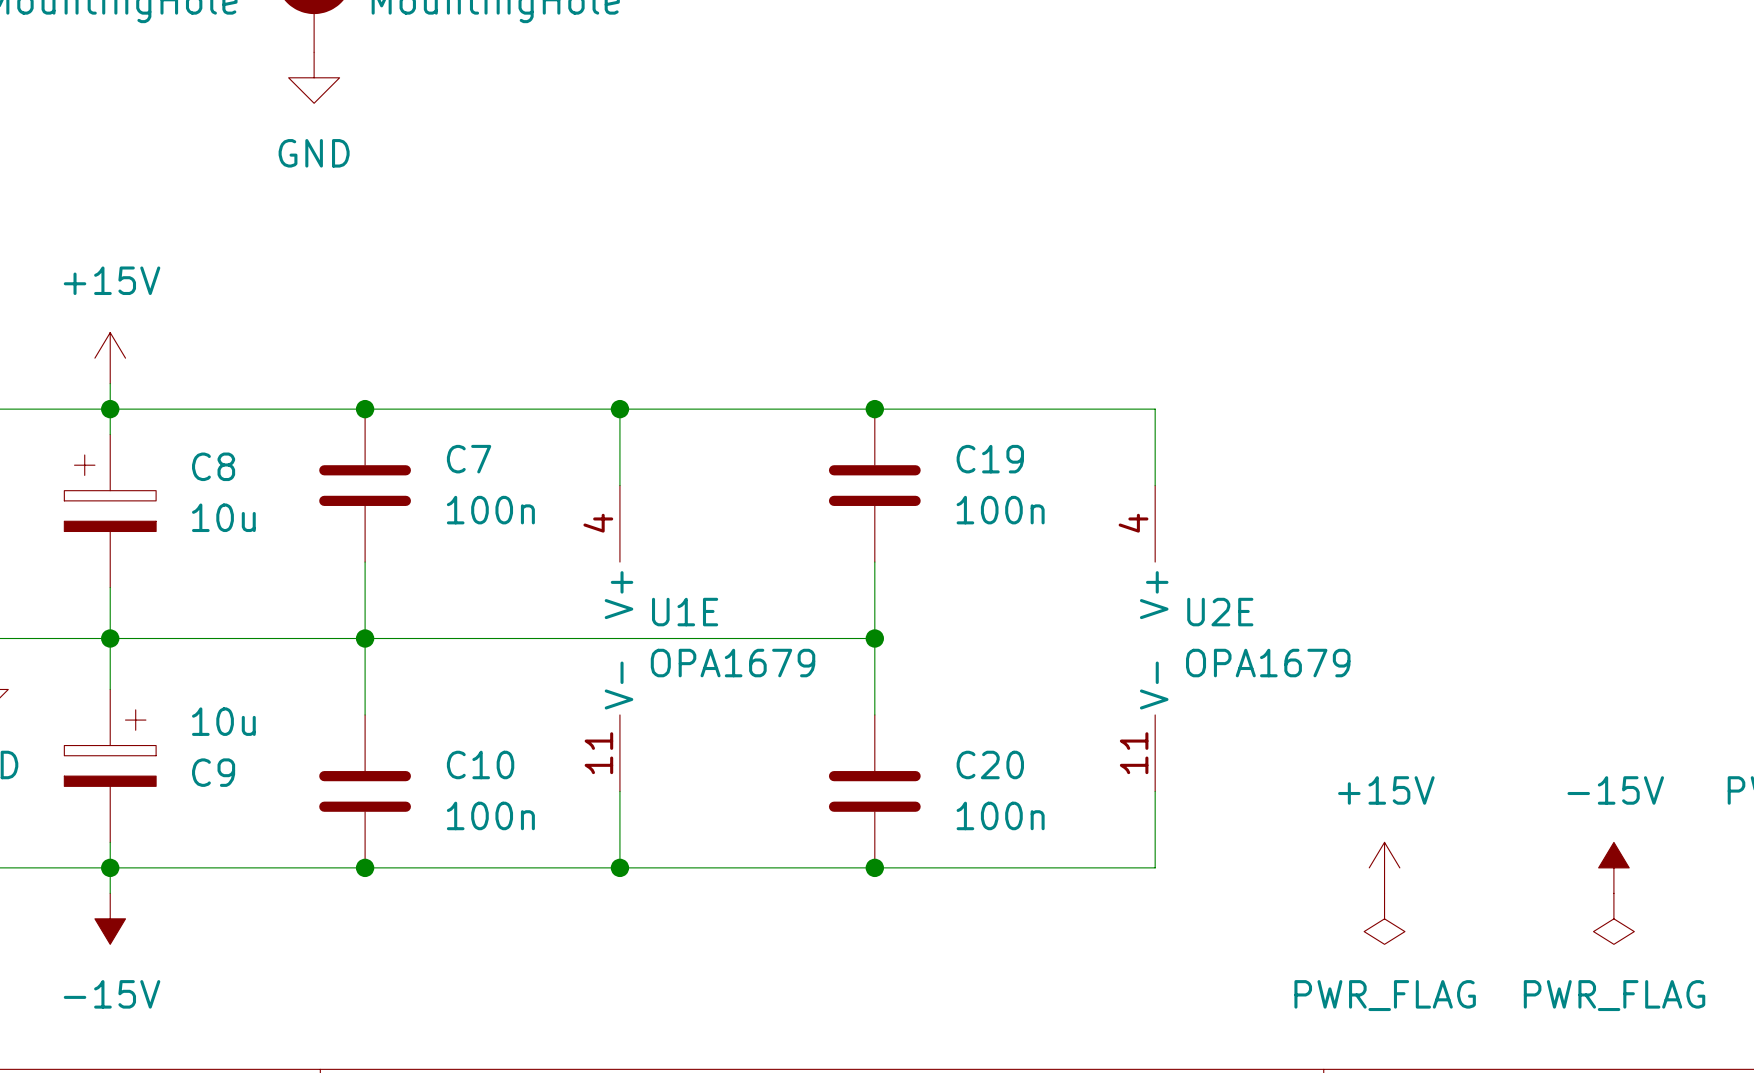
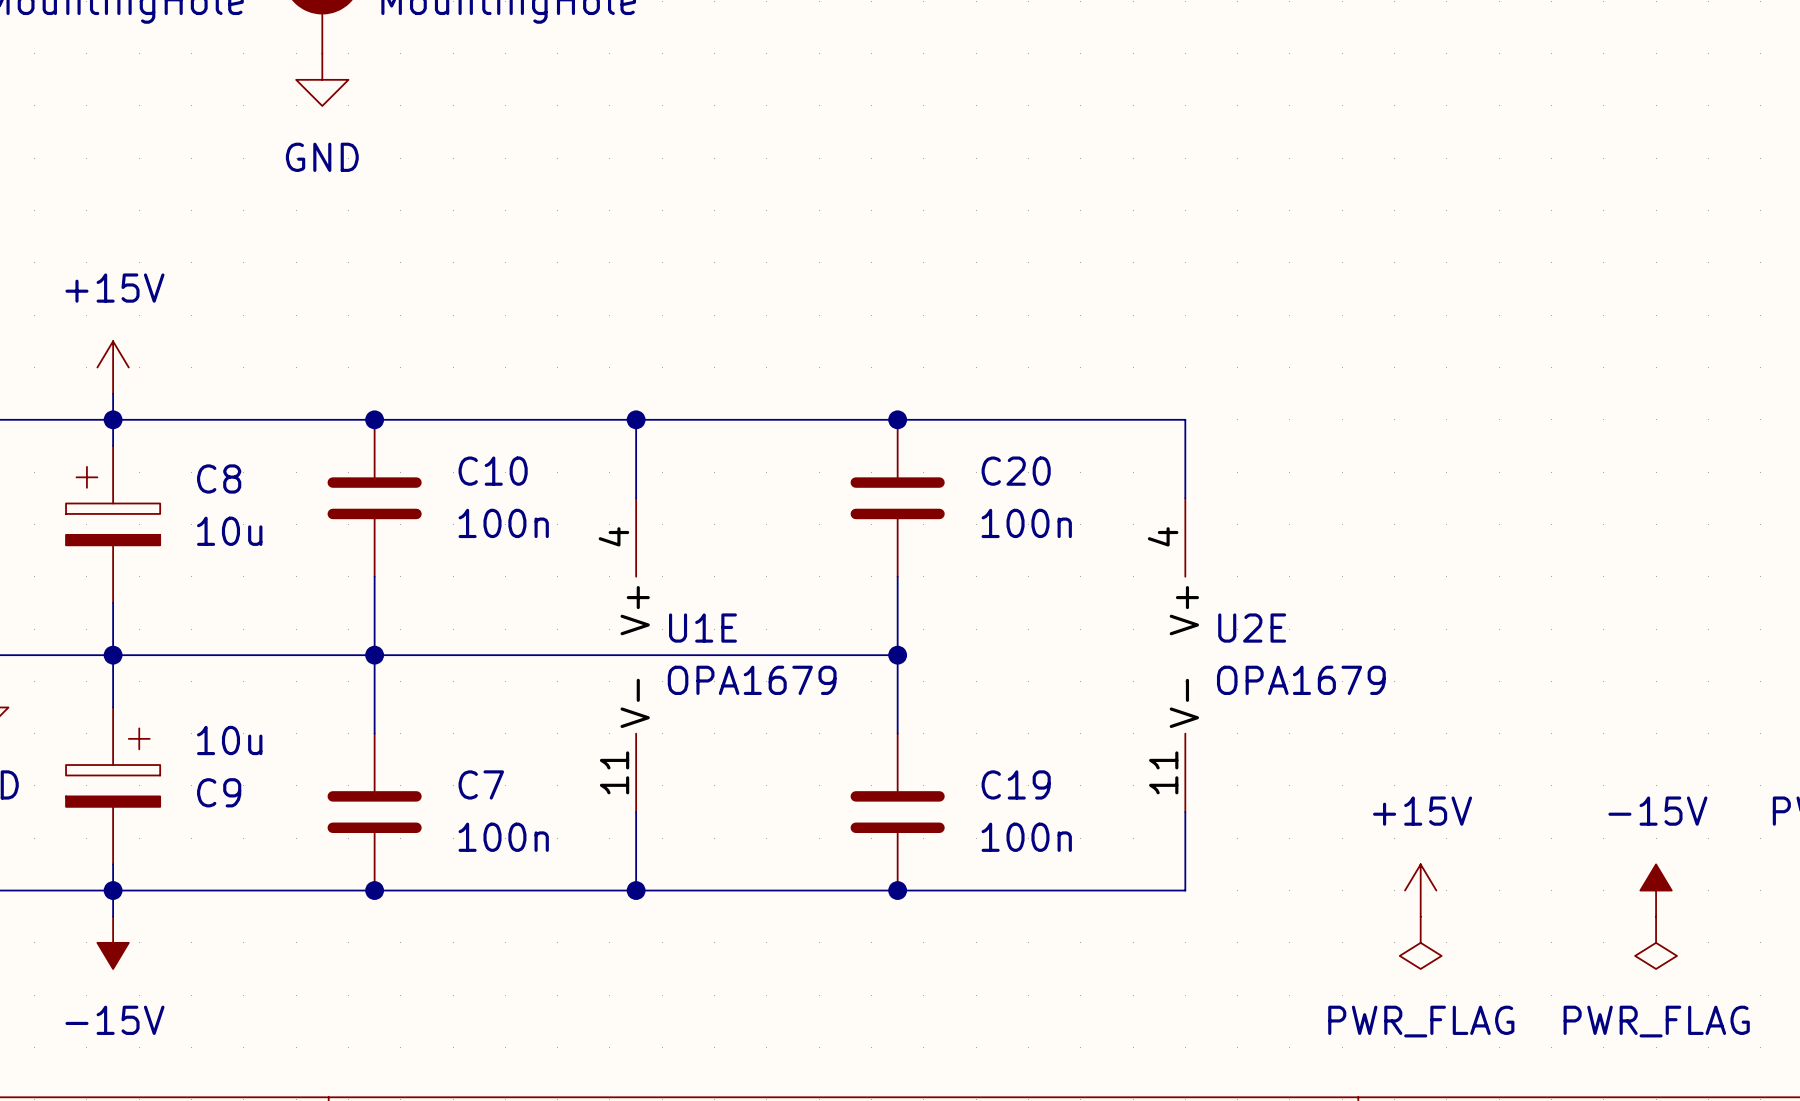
C7 name: C7 (469, 459) -> C10 (493, 471)
C19 name: C19 (990, 459) -> C20 (1016, 471)
C10 name: C10 (480, 764) -> C7 (481, 784)
C20 name: C20 (990, 764) -> C19 (1016, 784)

